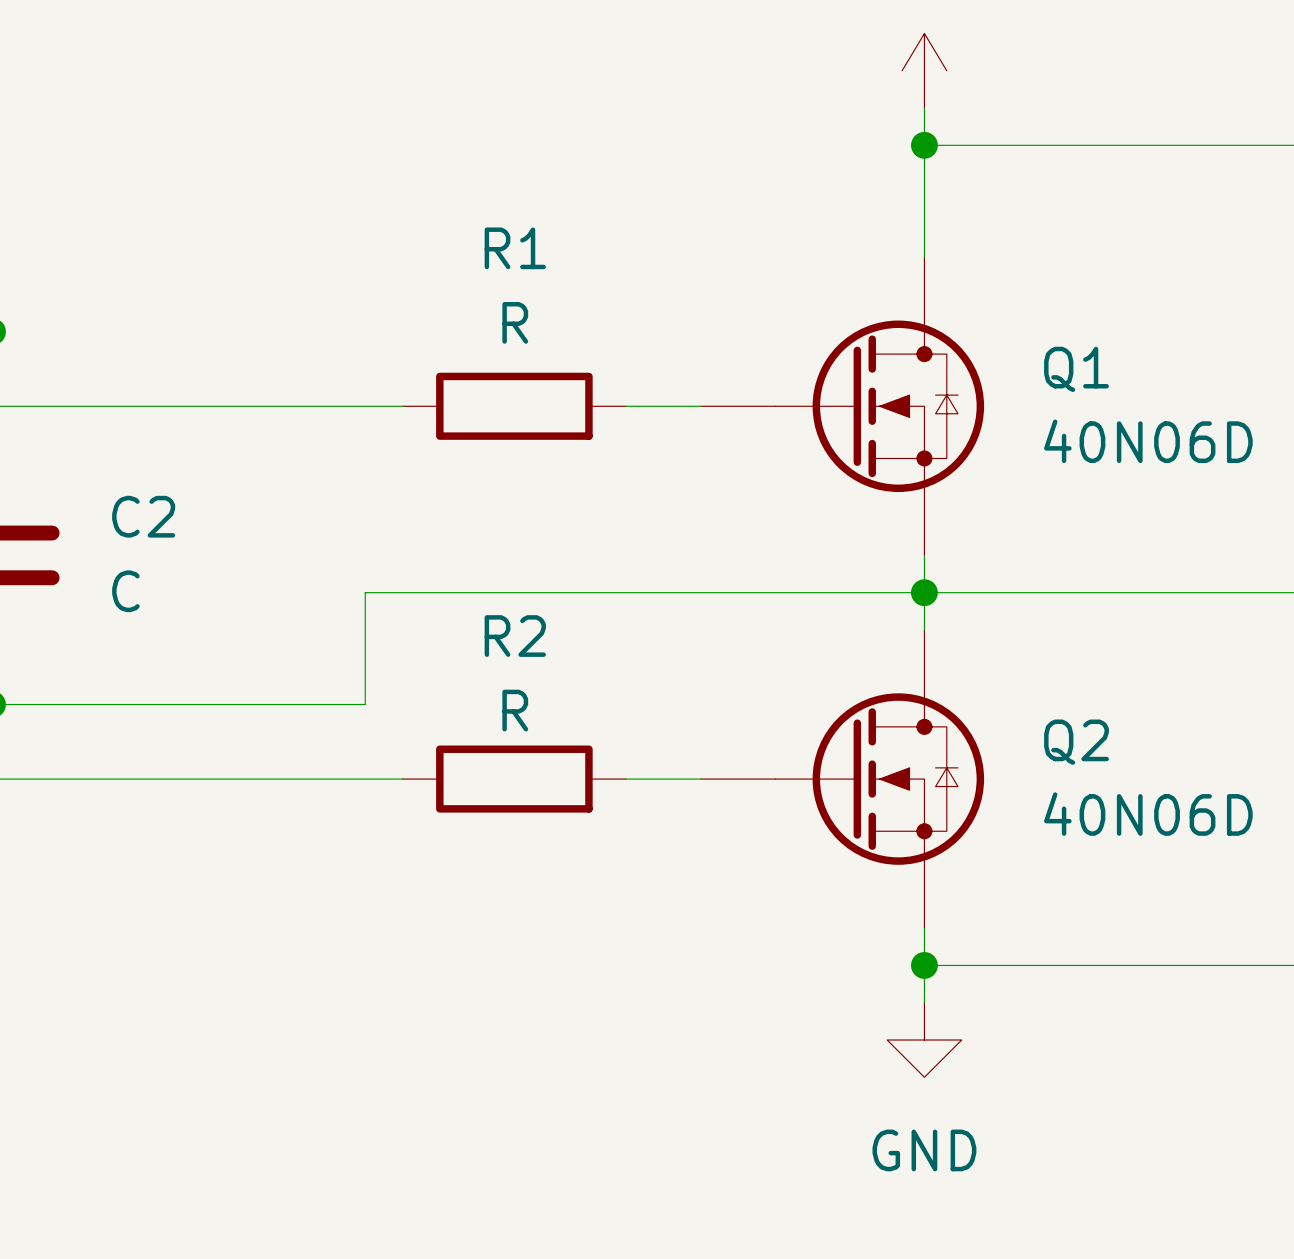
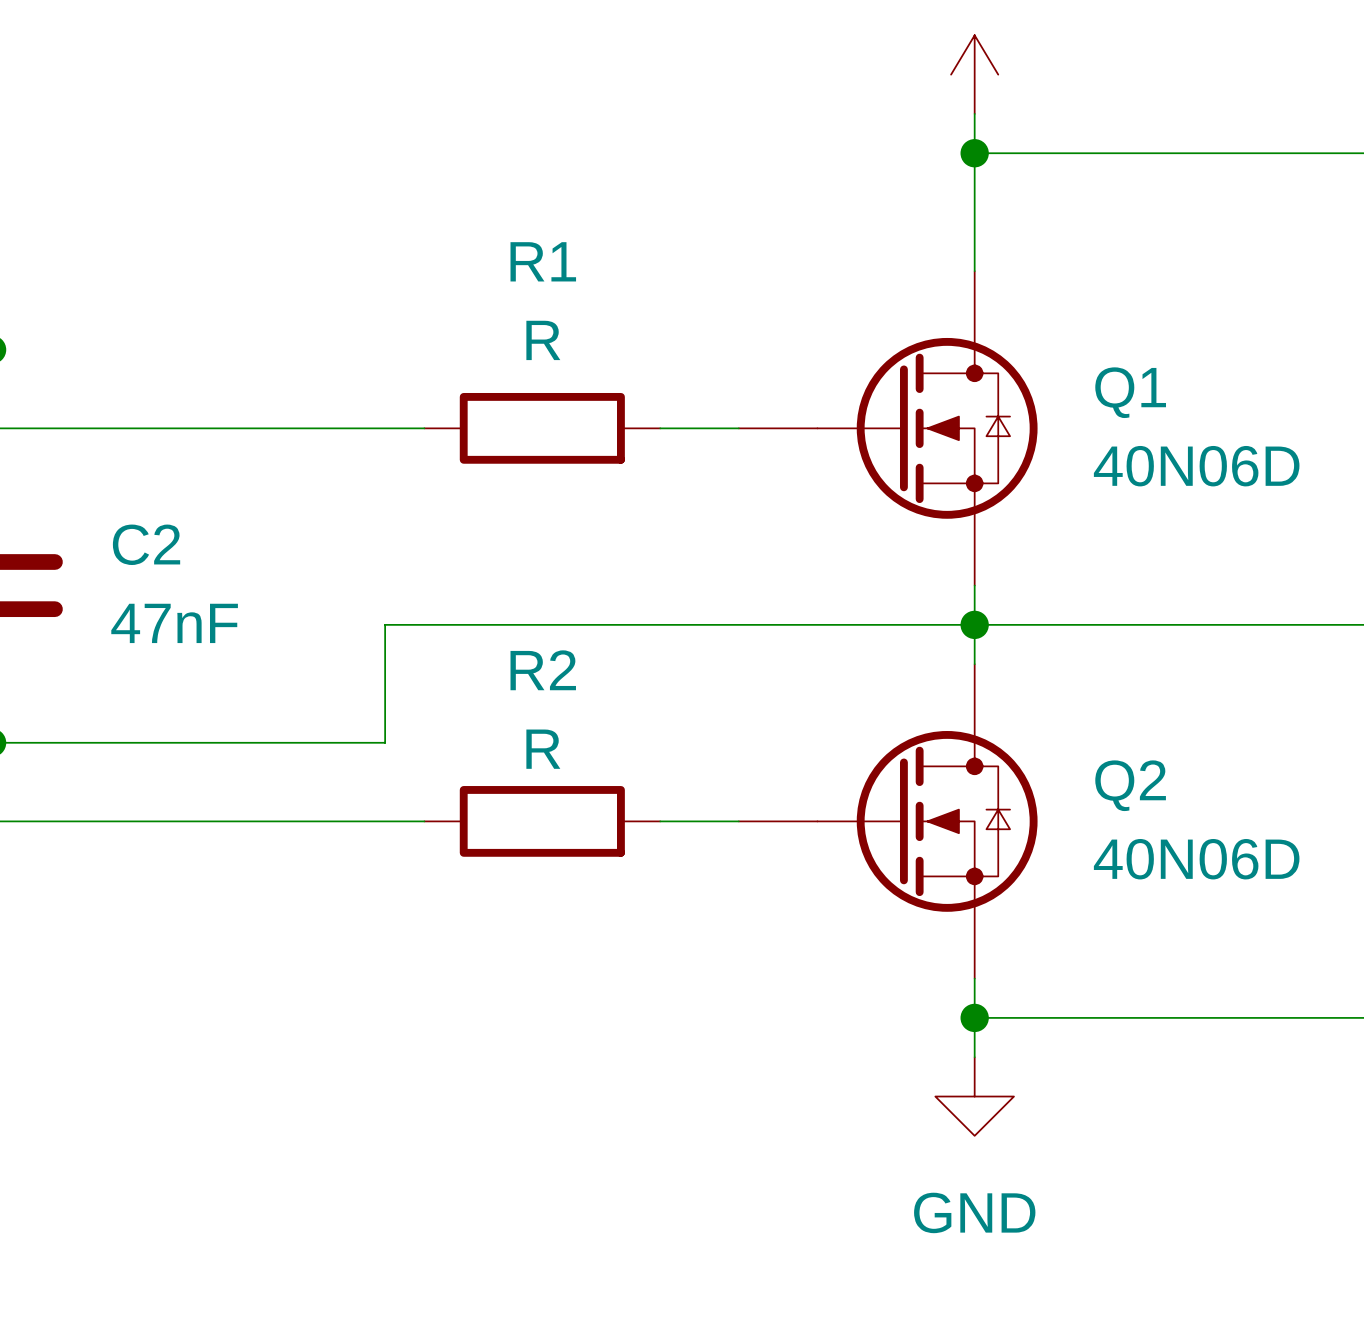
C2 value: C (125, 591) -> 47nF (174, 623)

